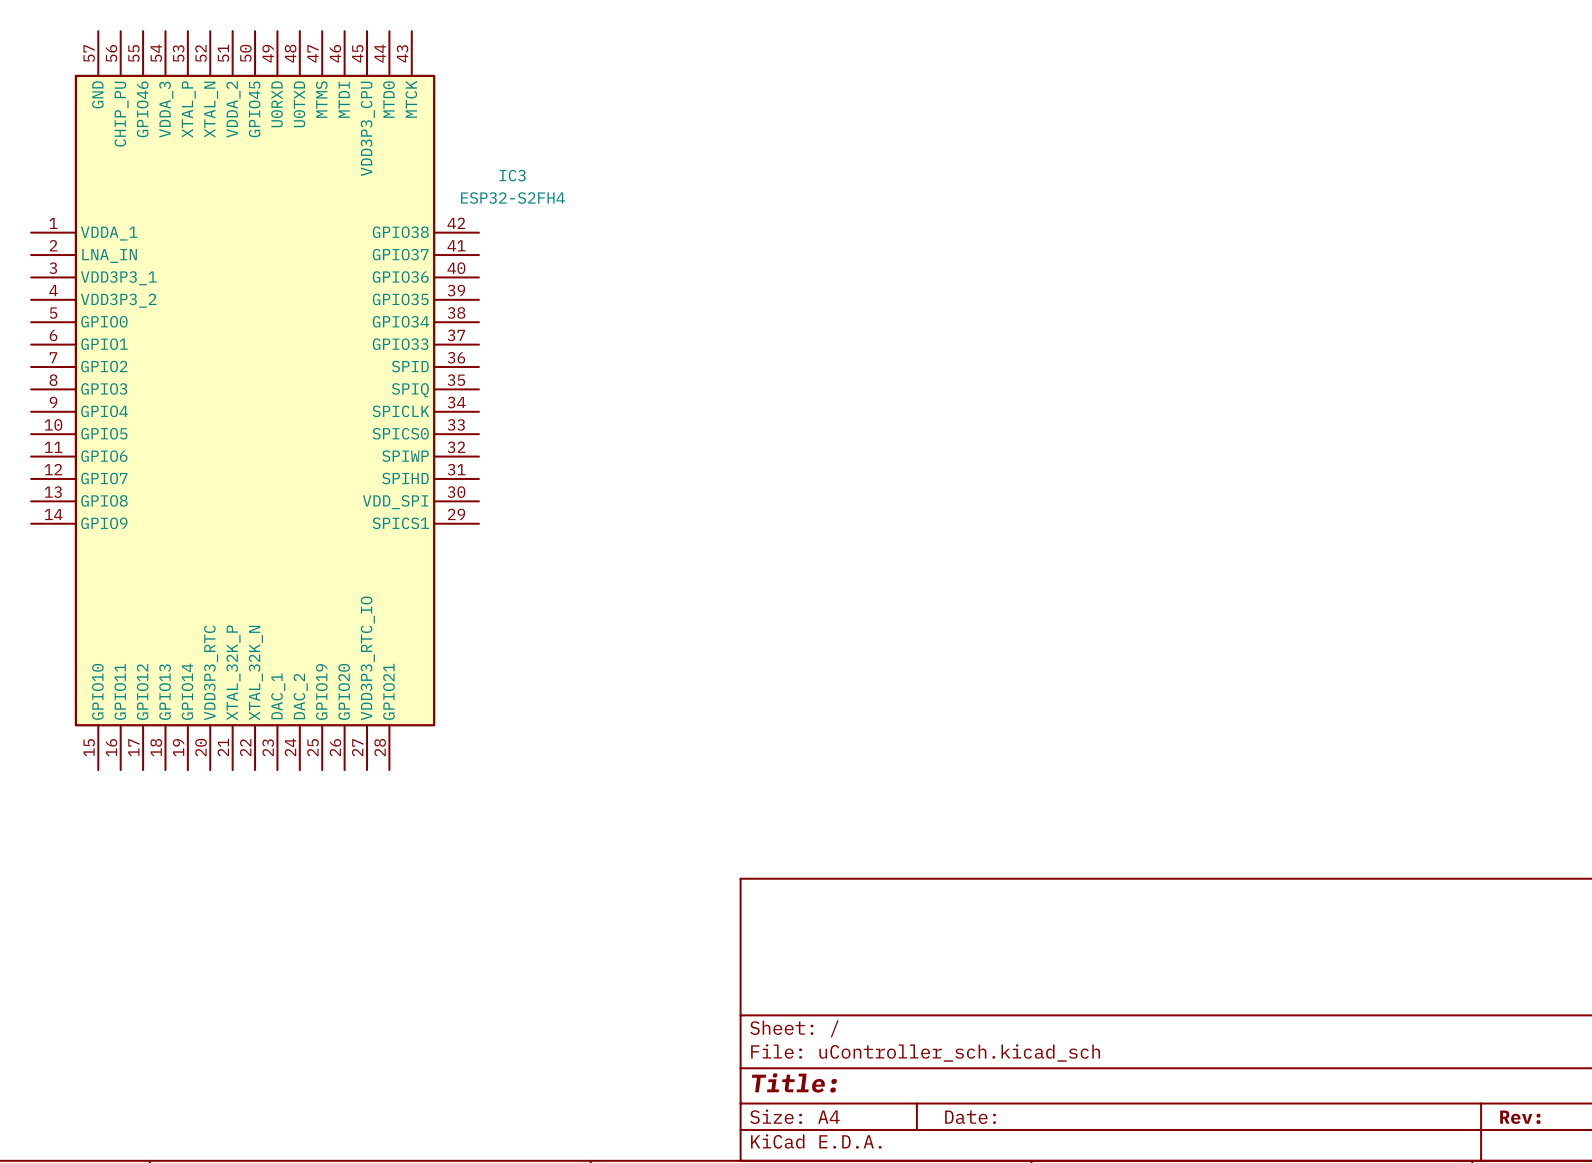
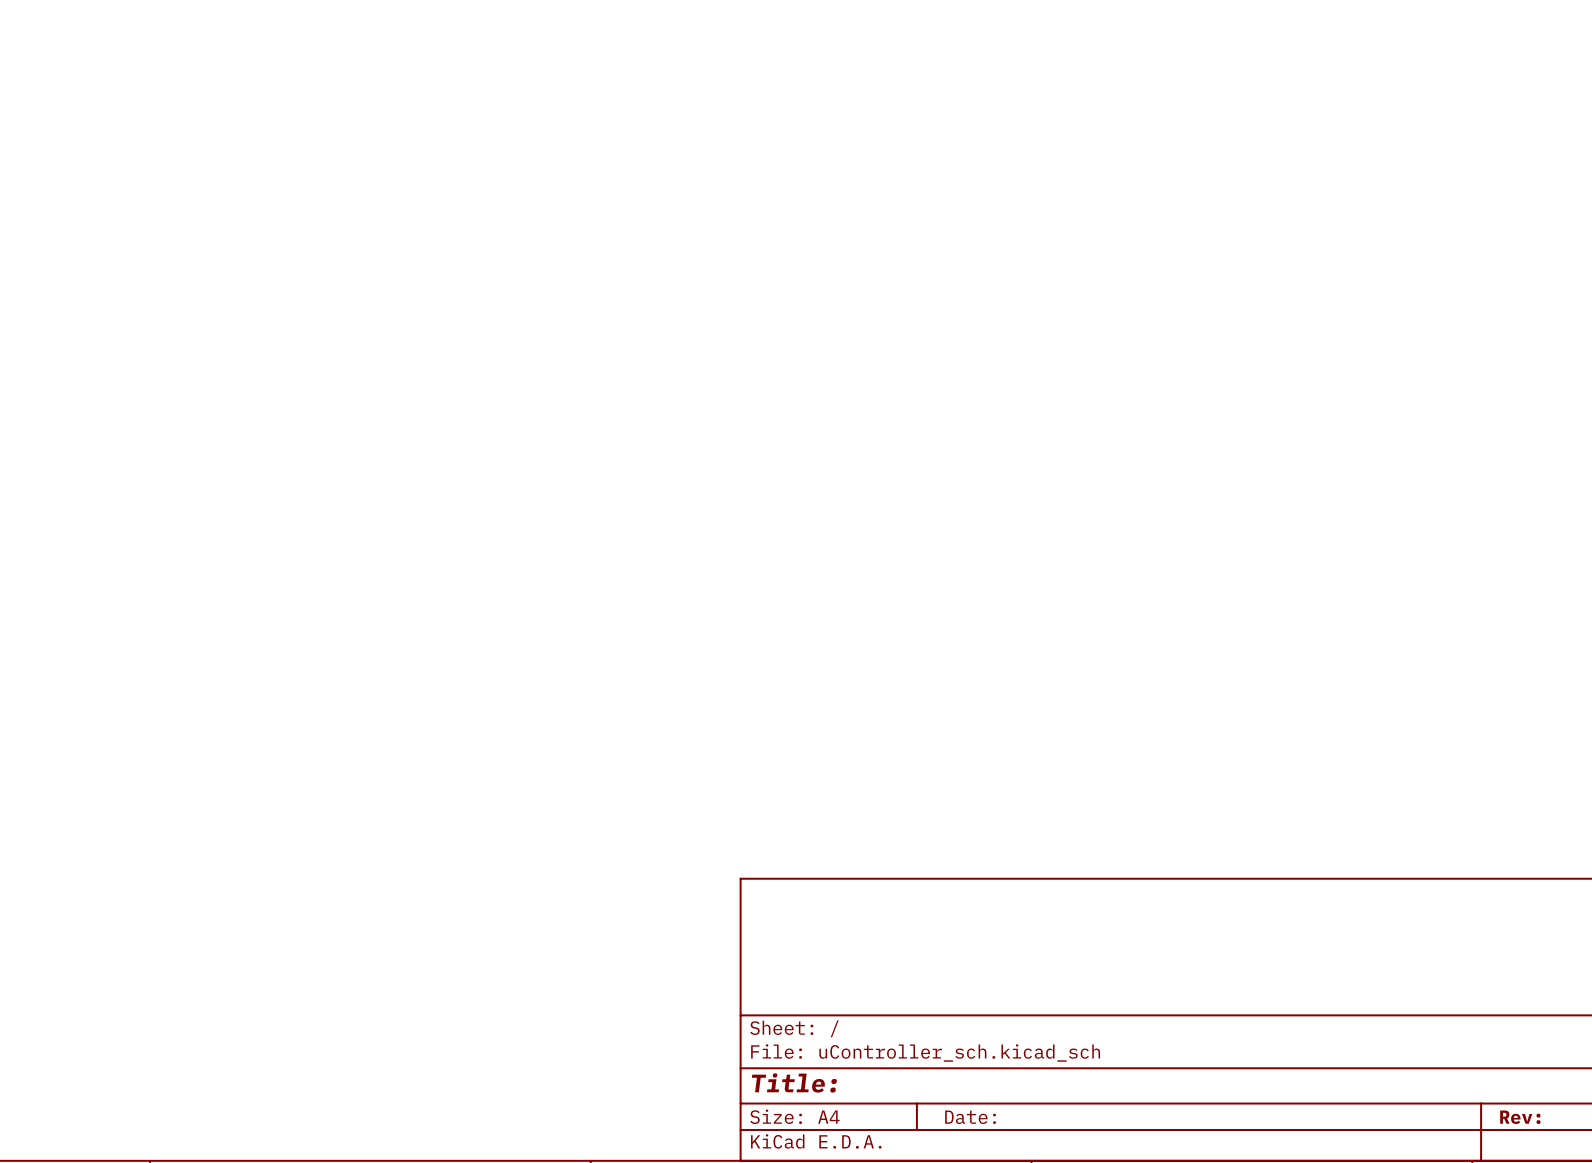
IC3: ESP32-S2FH4 (255, 400) -> none

